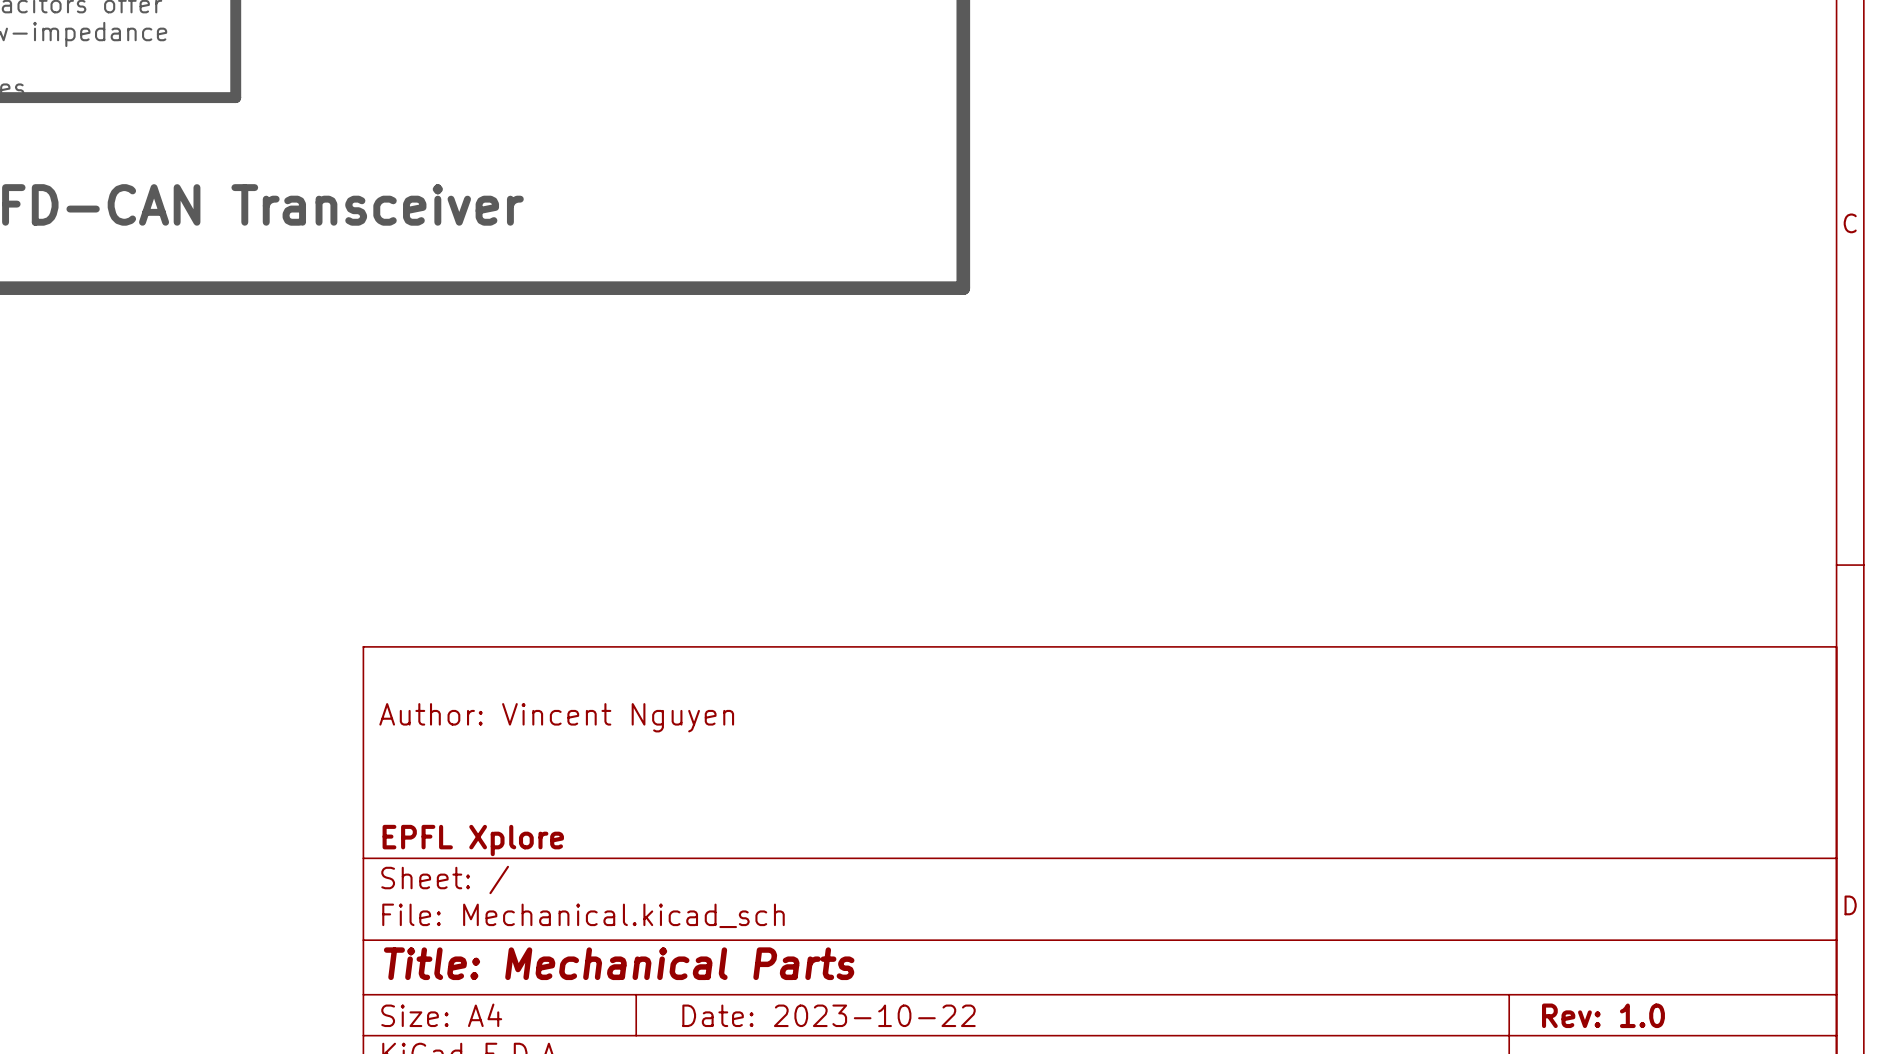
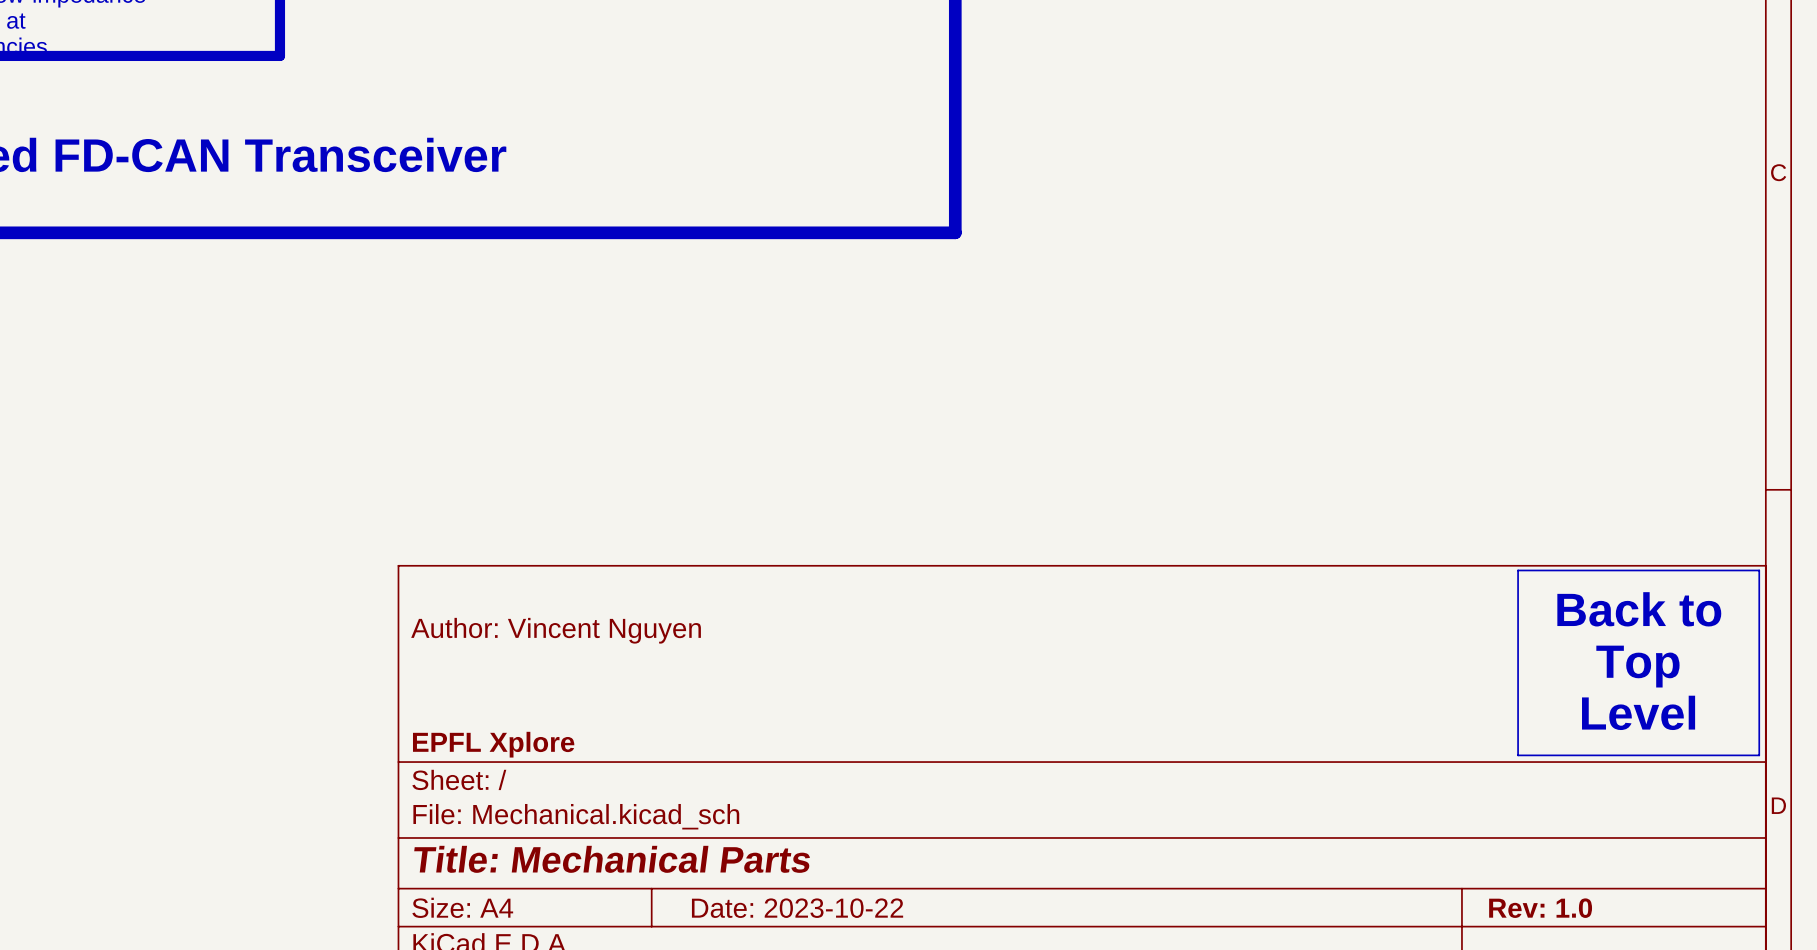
line: none -> (1518, 570) (1759, 570) (1759, 755) (1518, 755) (1518, 570)
text: none -> Back to (1639, 609)
text: none -> Top (1637, 666)
text: none -> Level (1638, 712)

